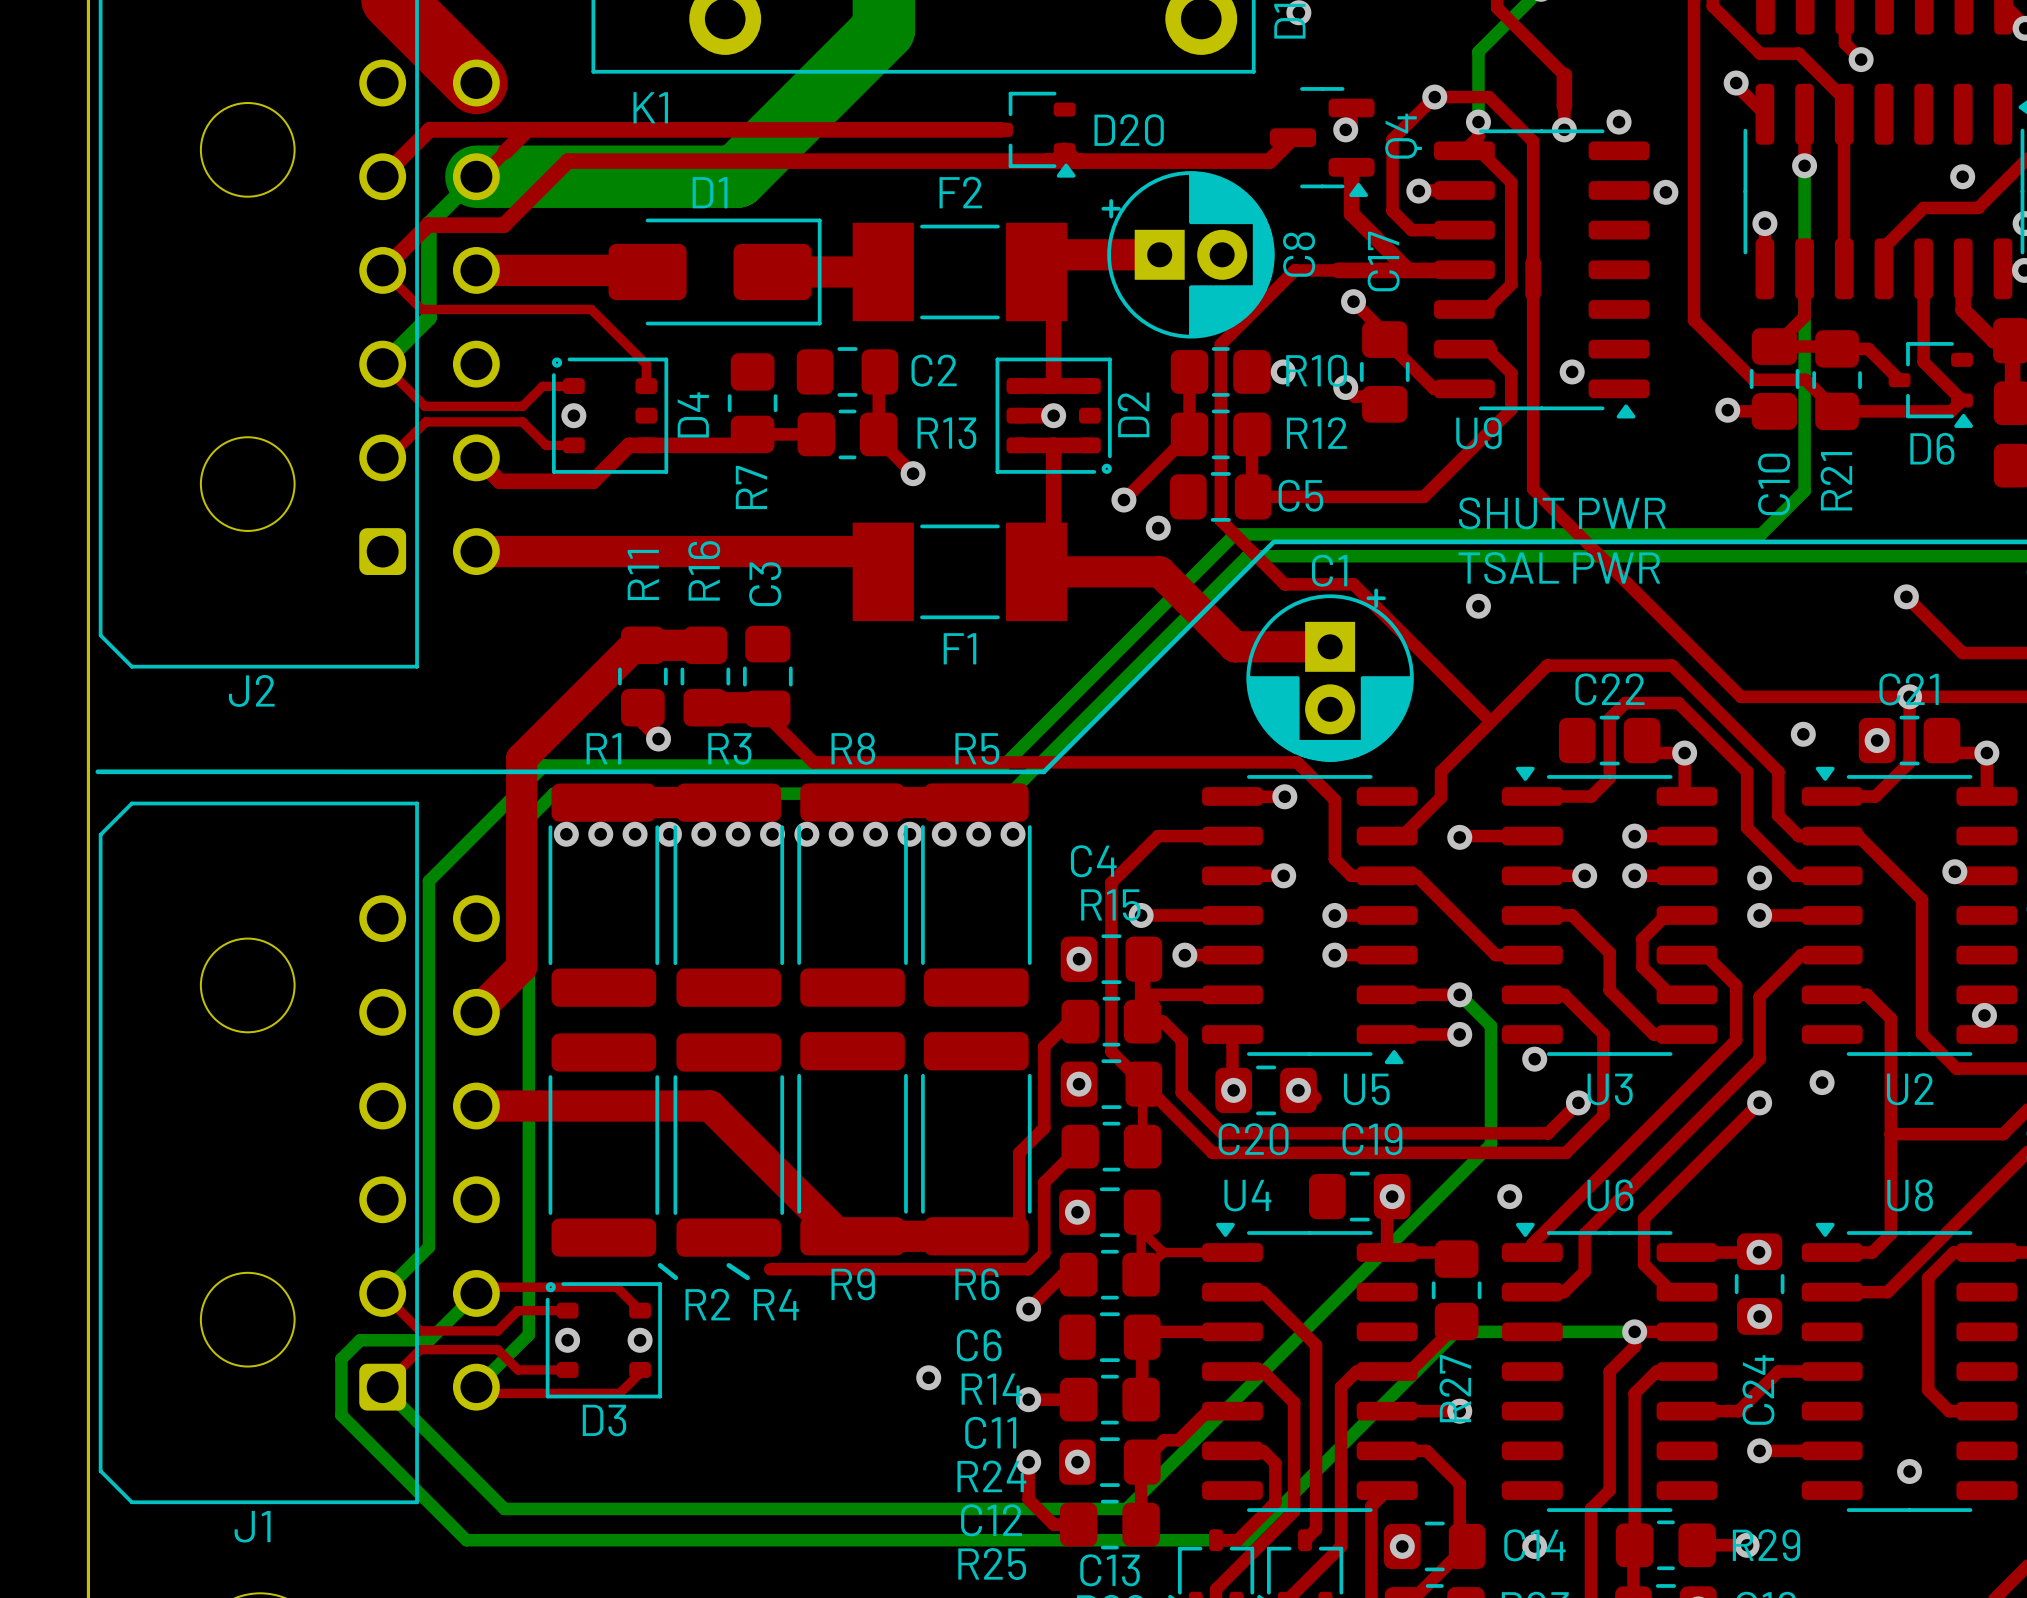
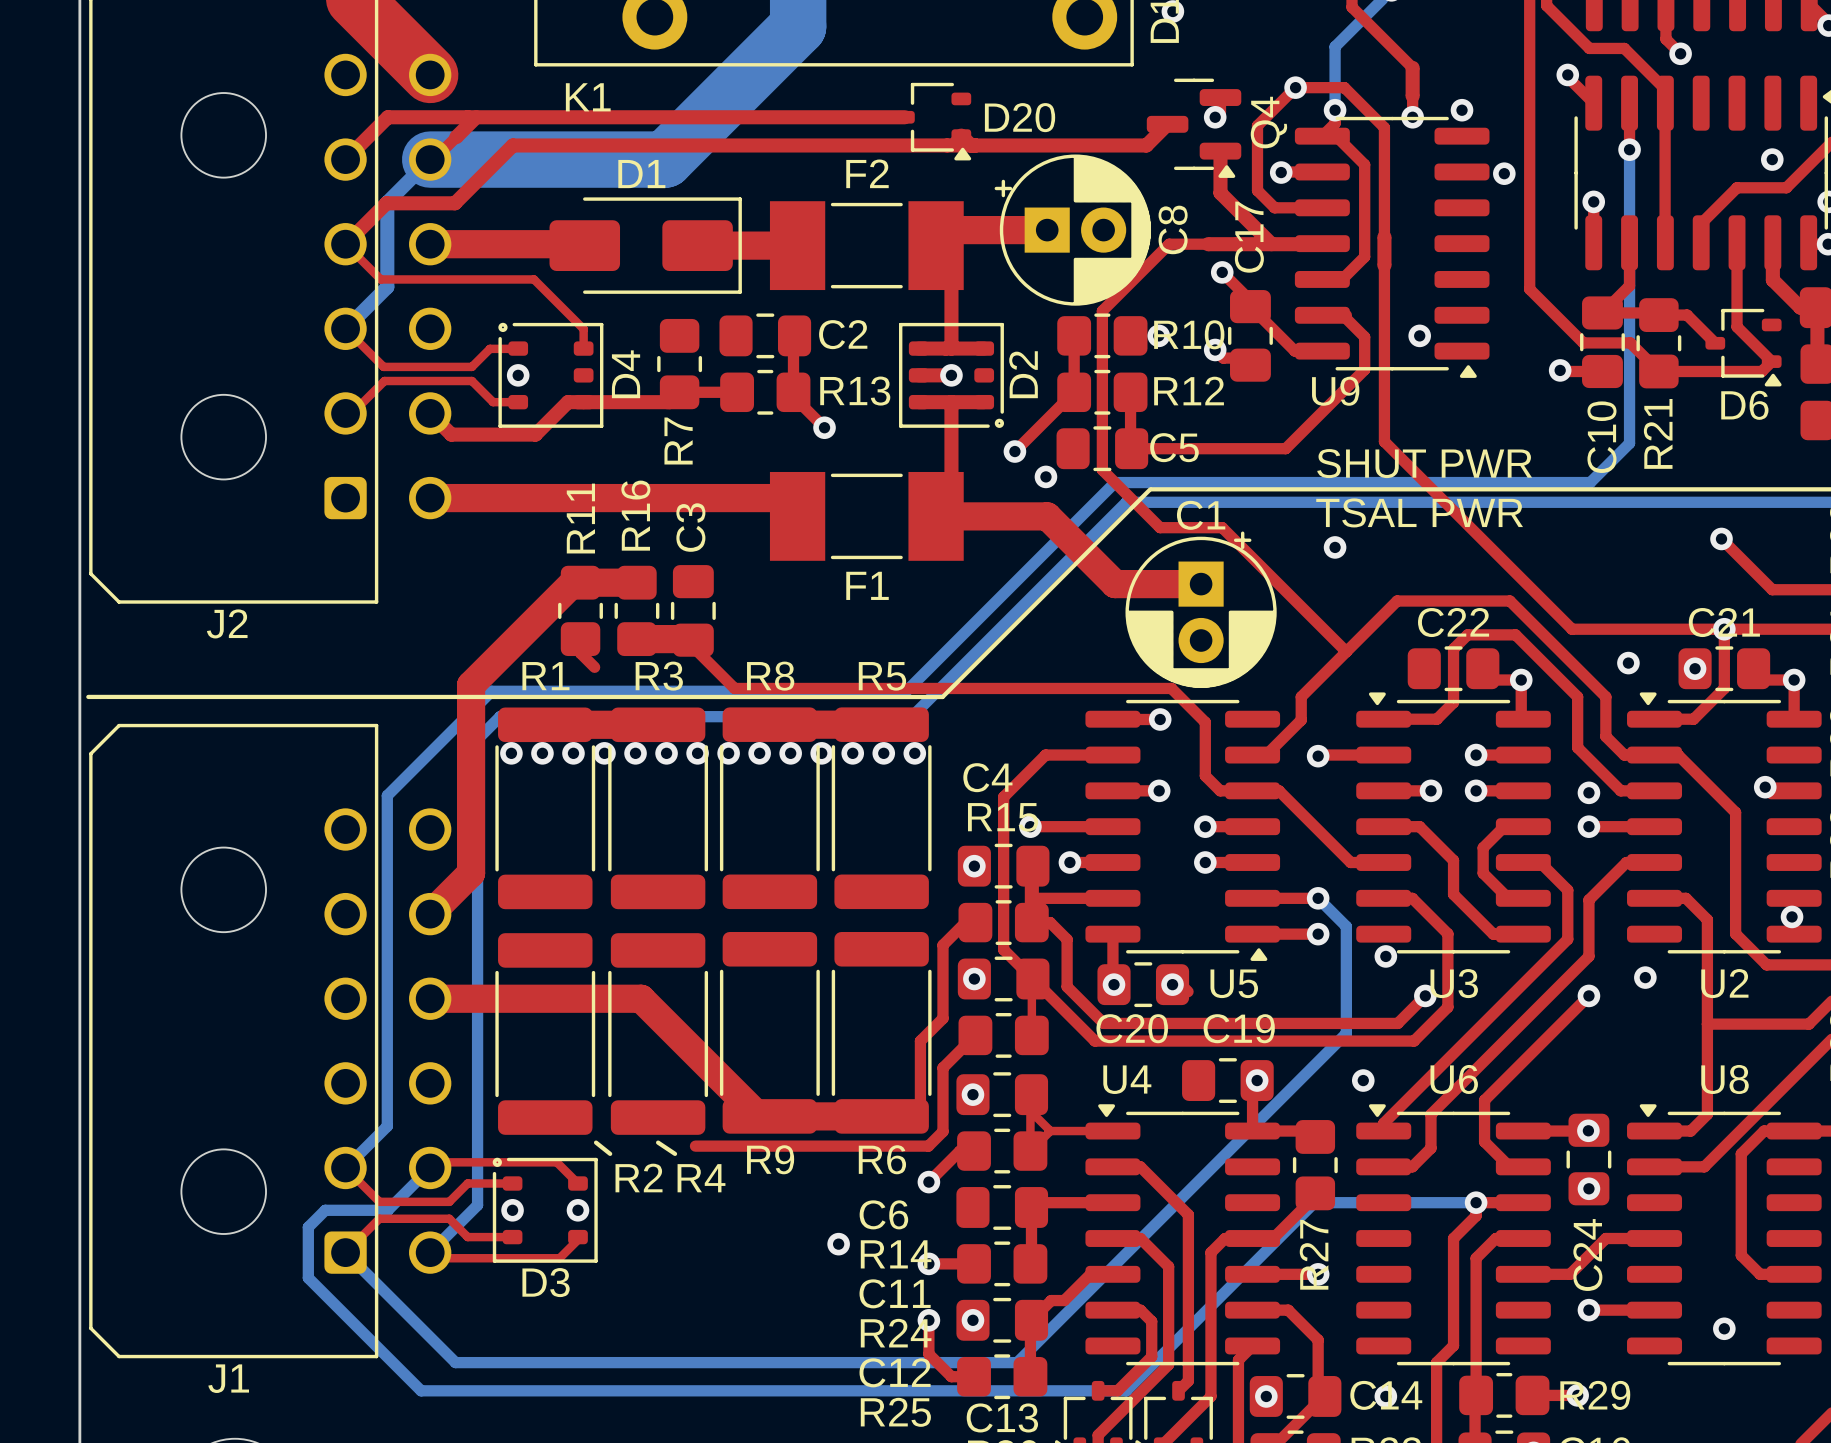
via: (658, 738) -> none

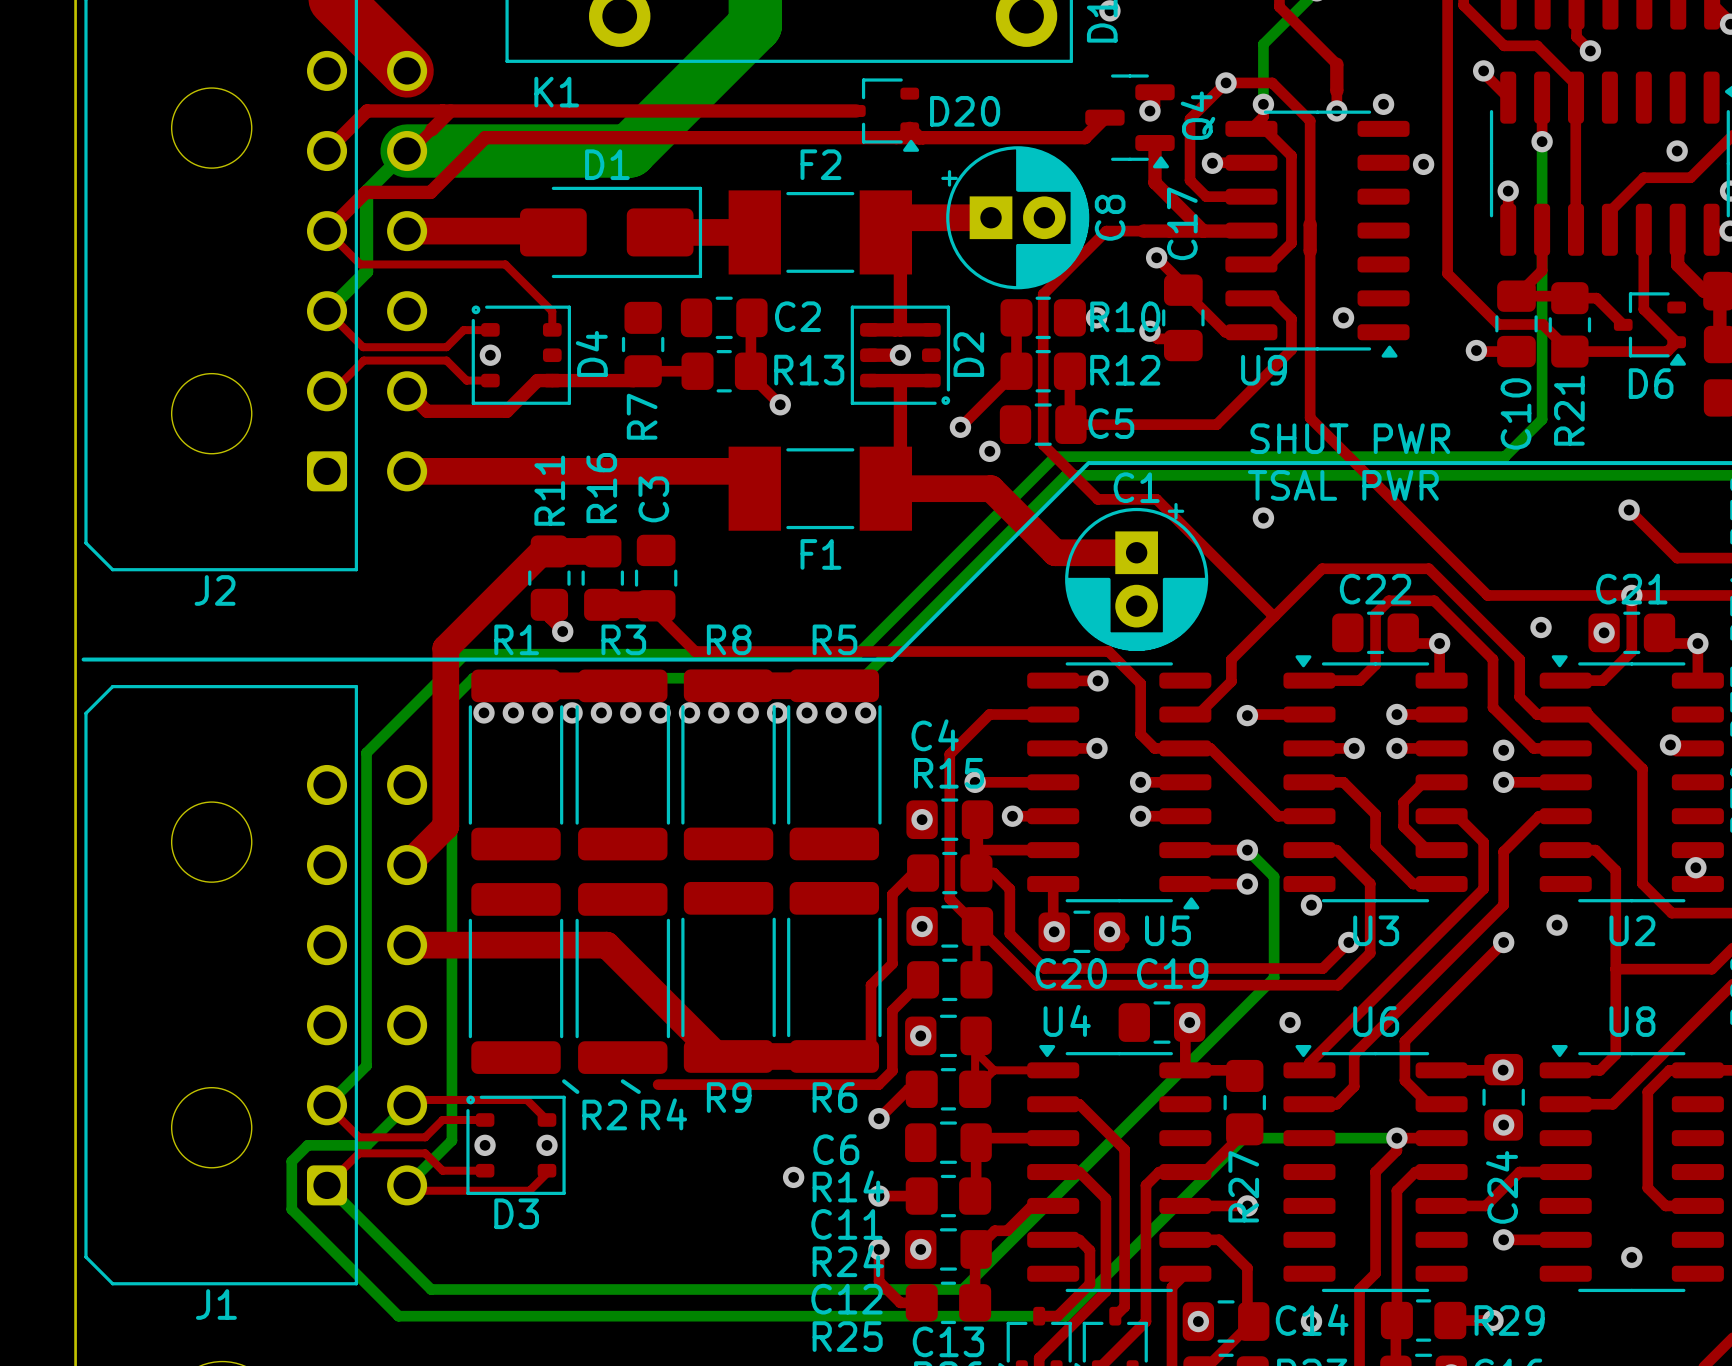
via: none -> (562, 631)

